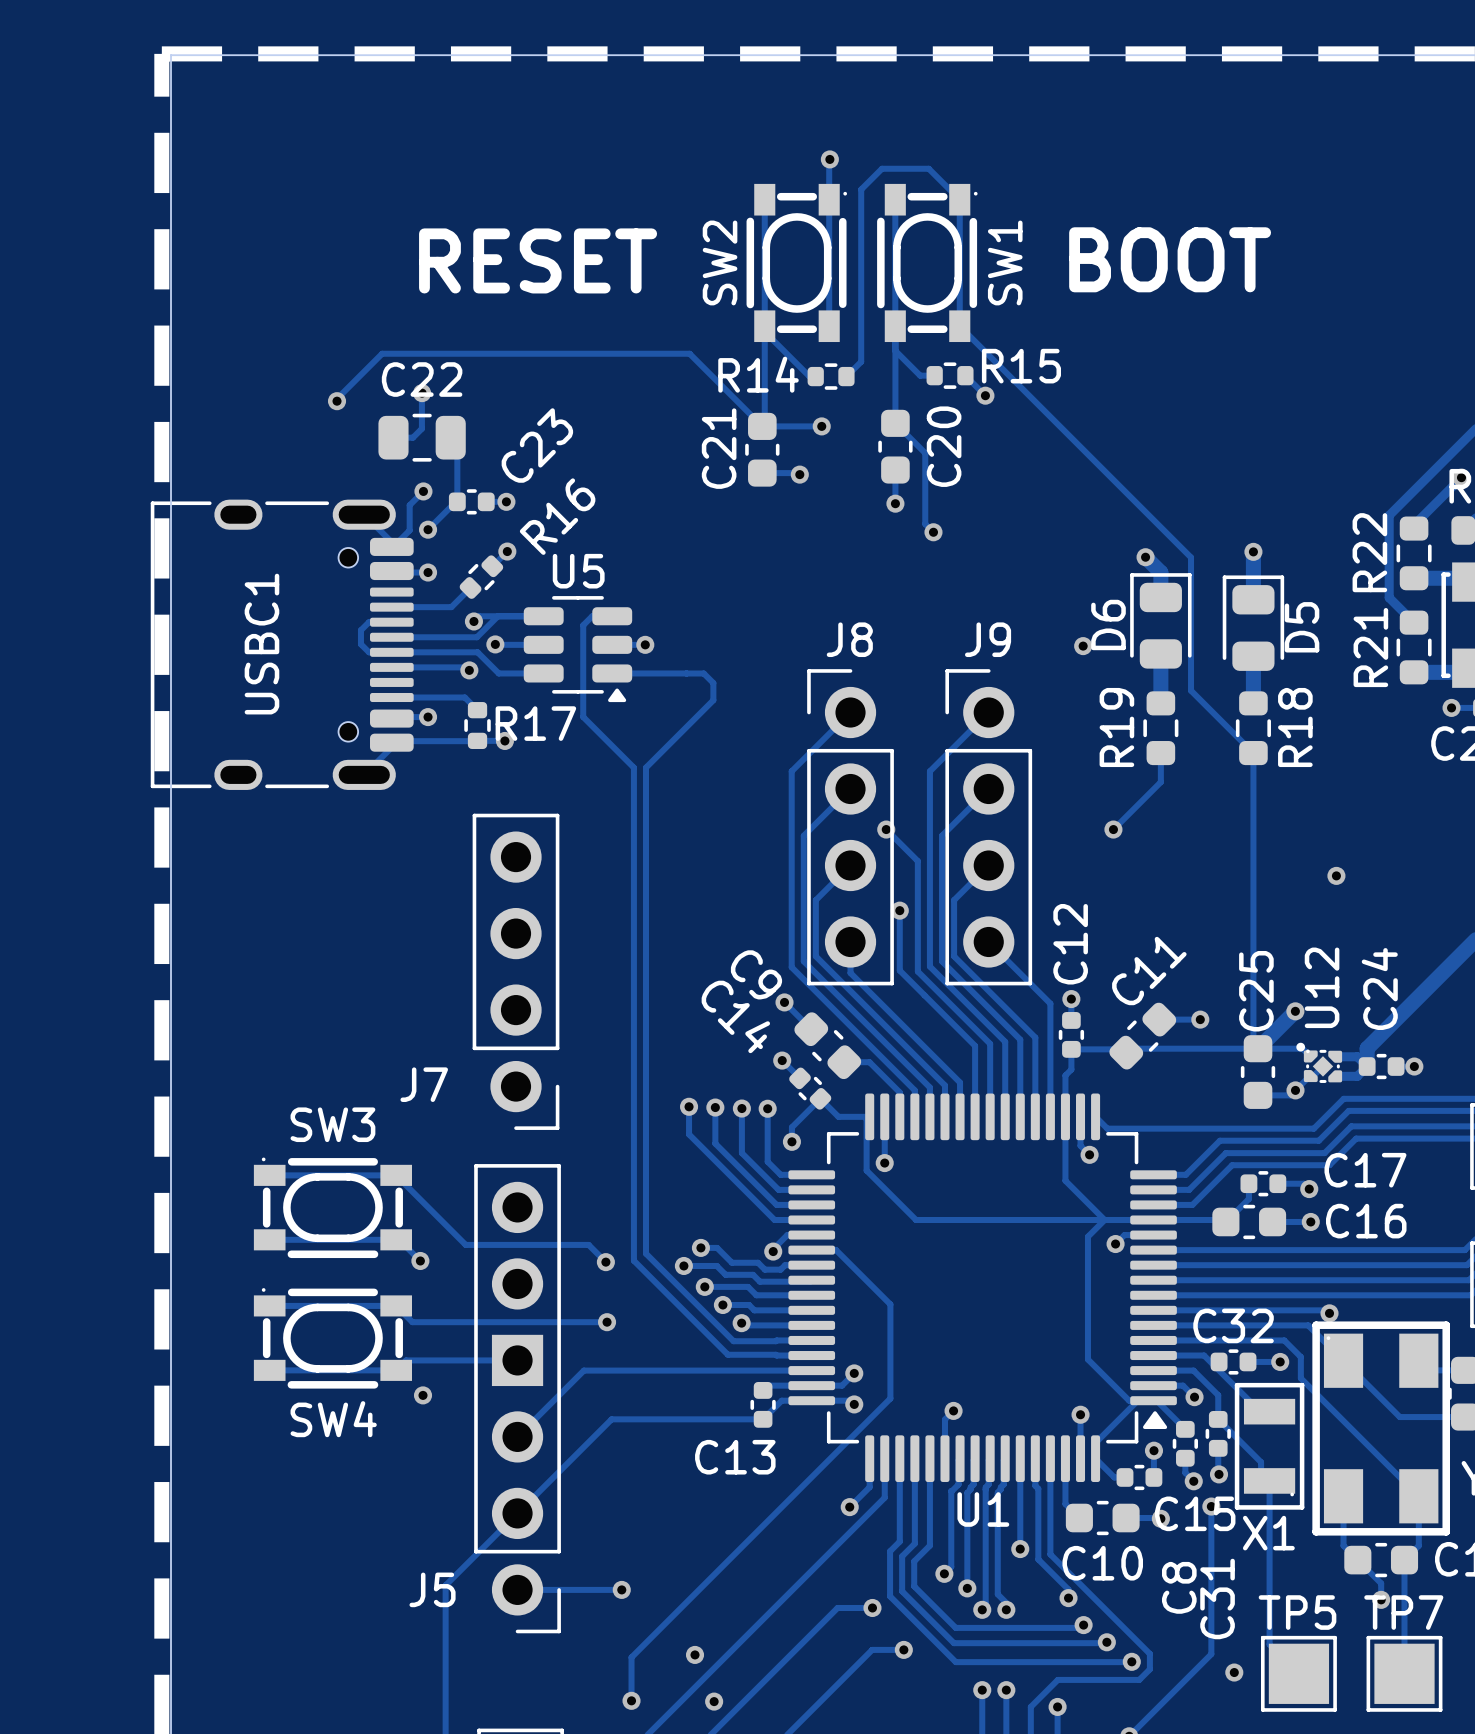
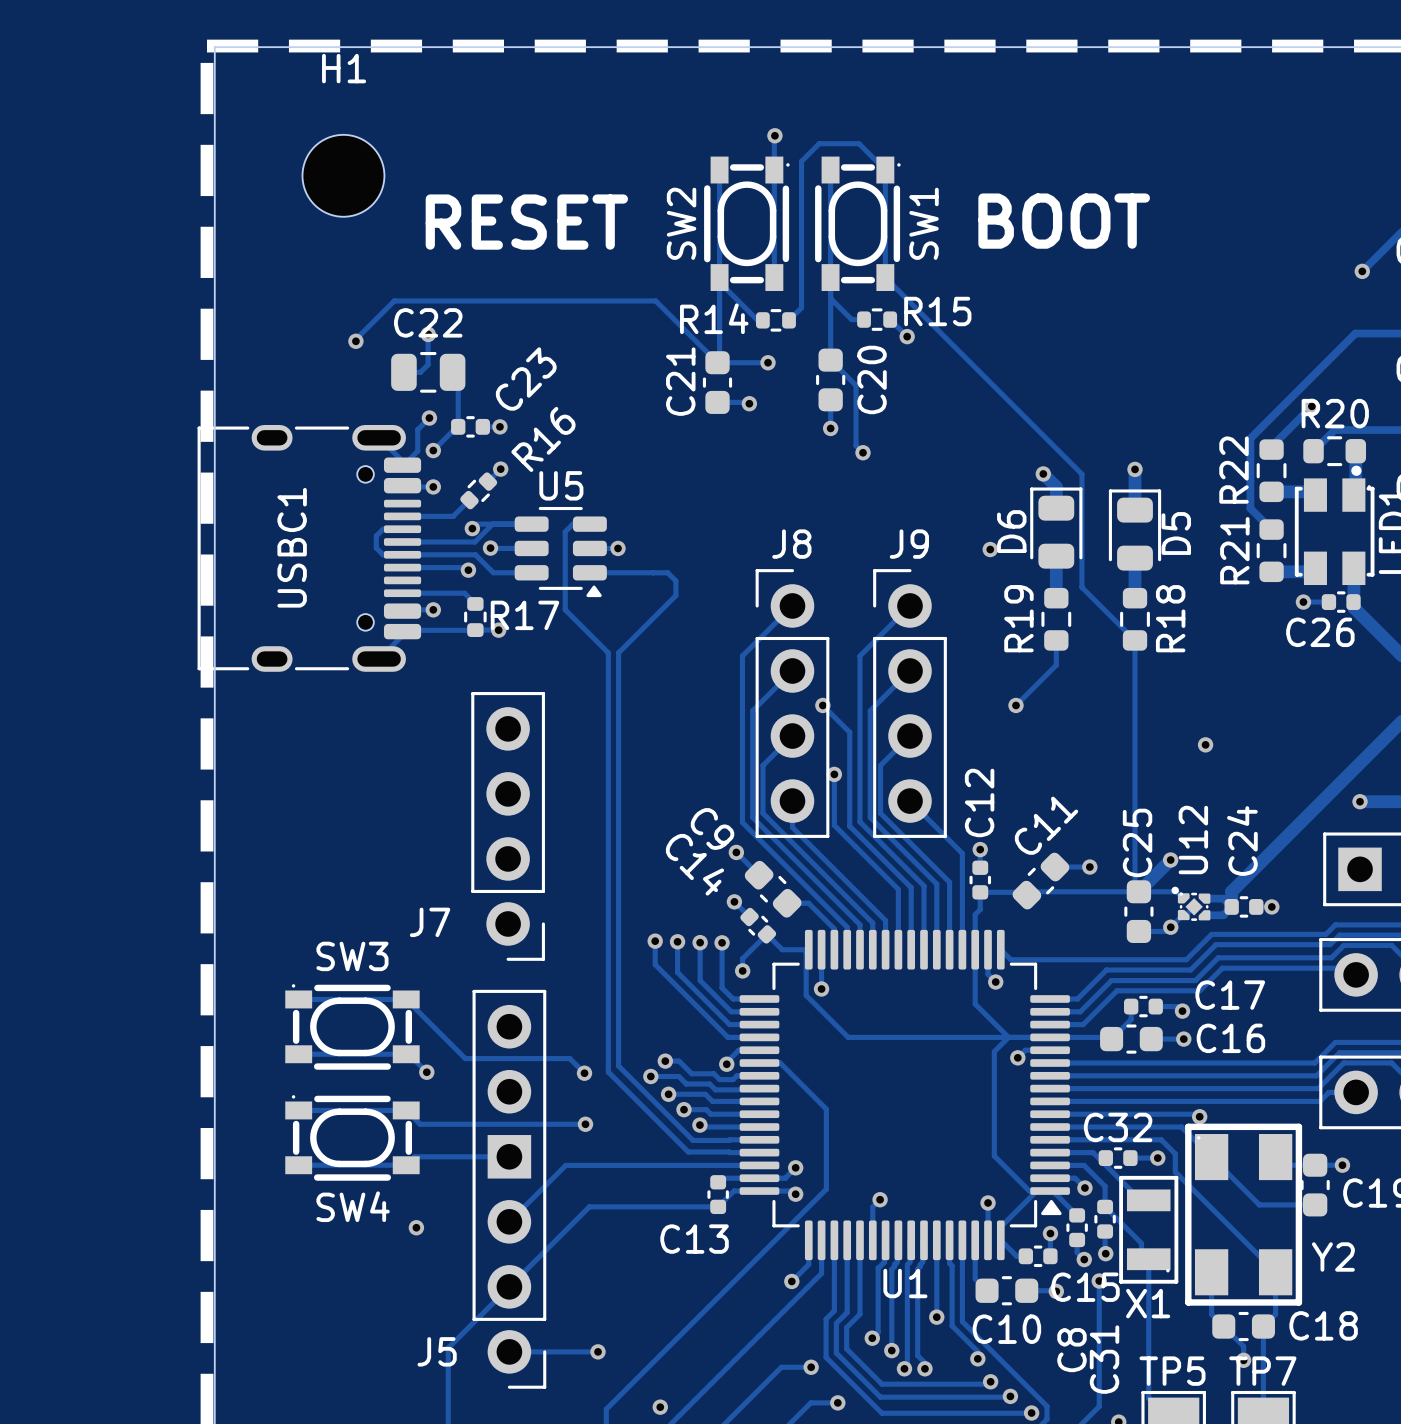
H1: none -> (343, 175)
via position: (423, 1395) -> (416, 1227)

